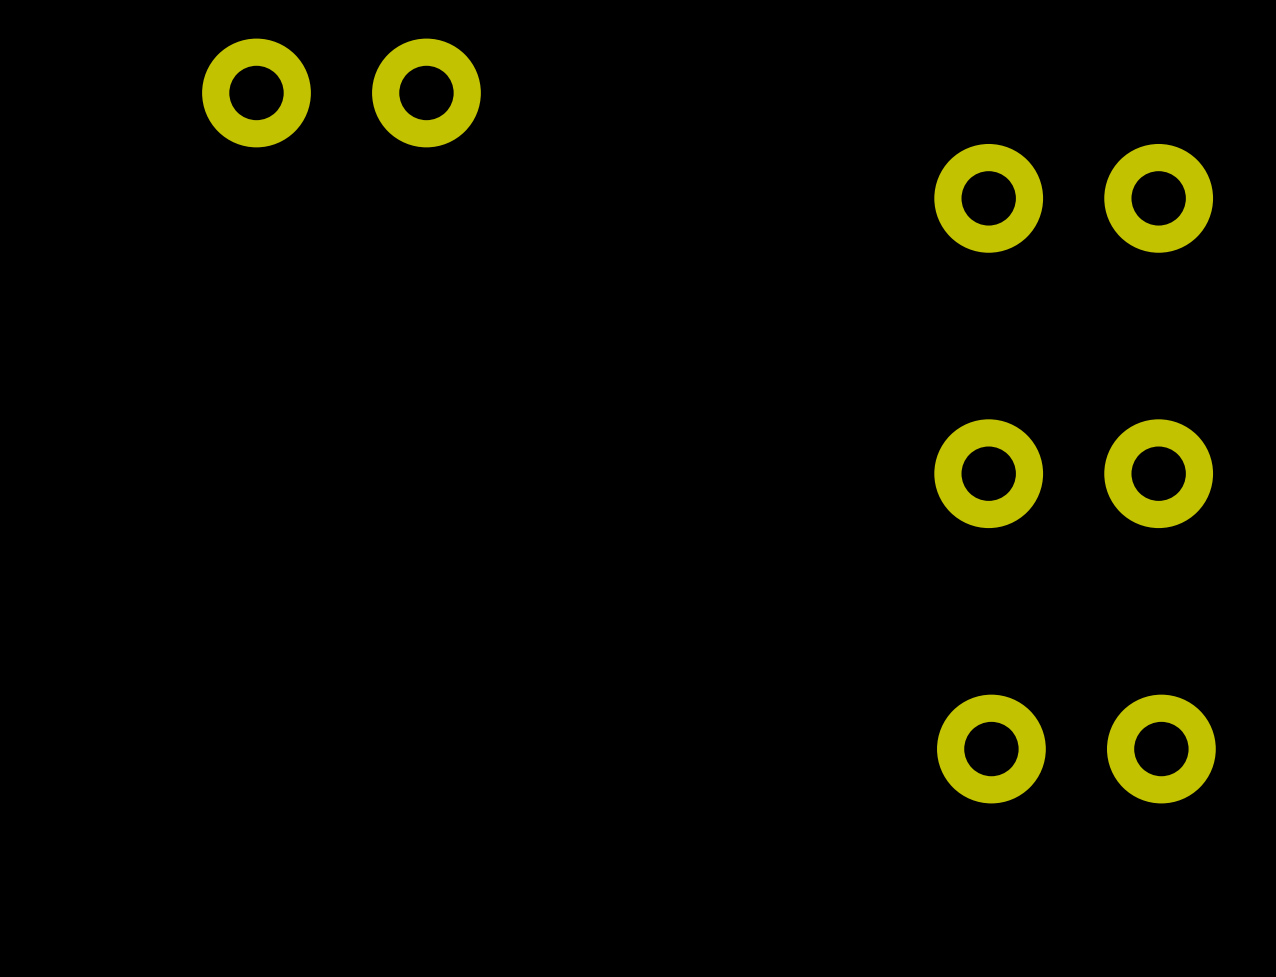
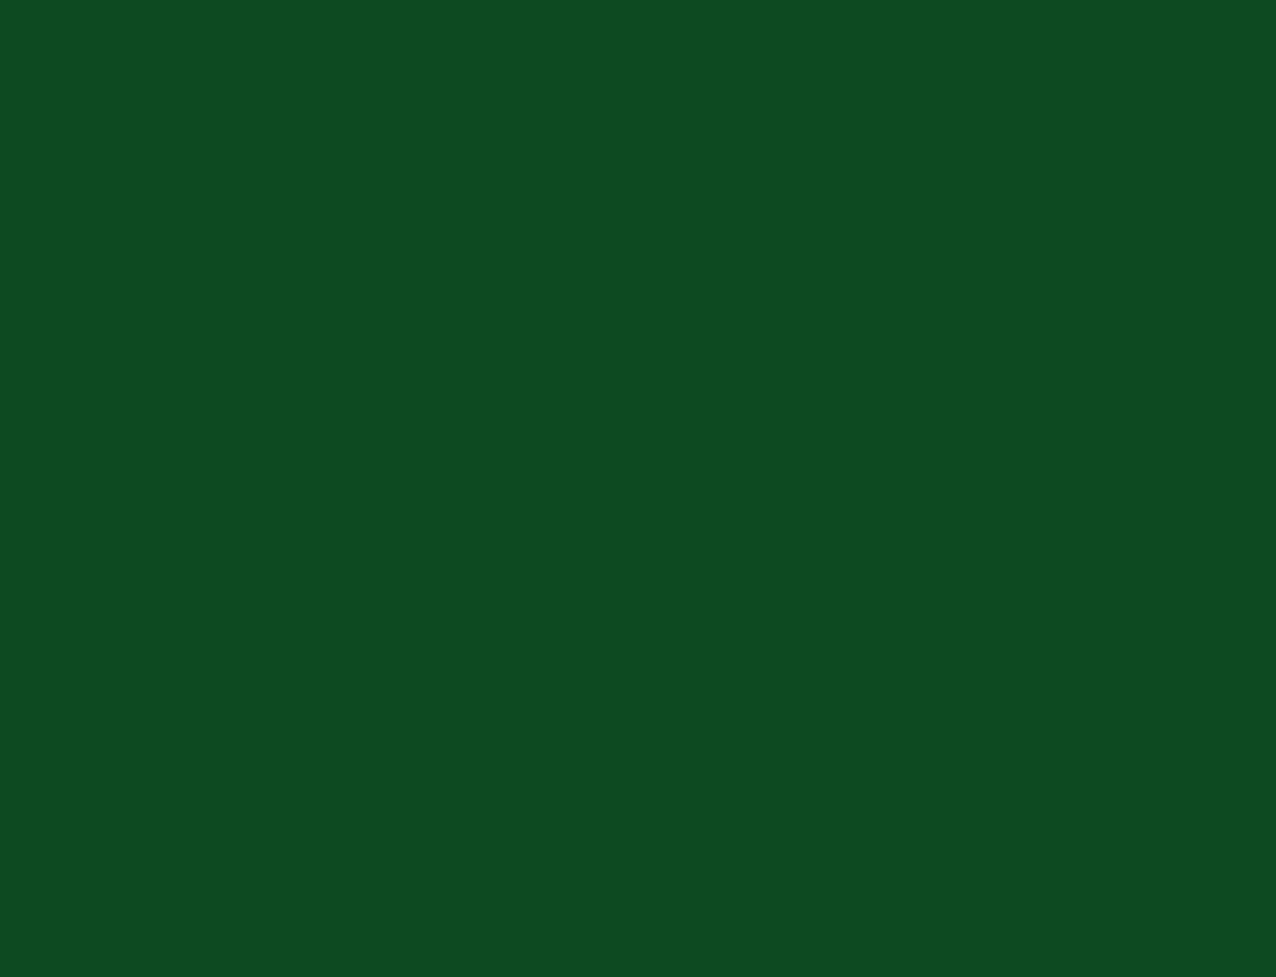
part: (341, 92) -> none
part: (1073, 198) -> none
part: (1073, 473) -> none
part: (1076, 749) -> none

